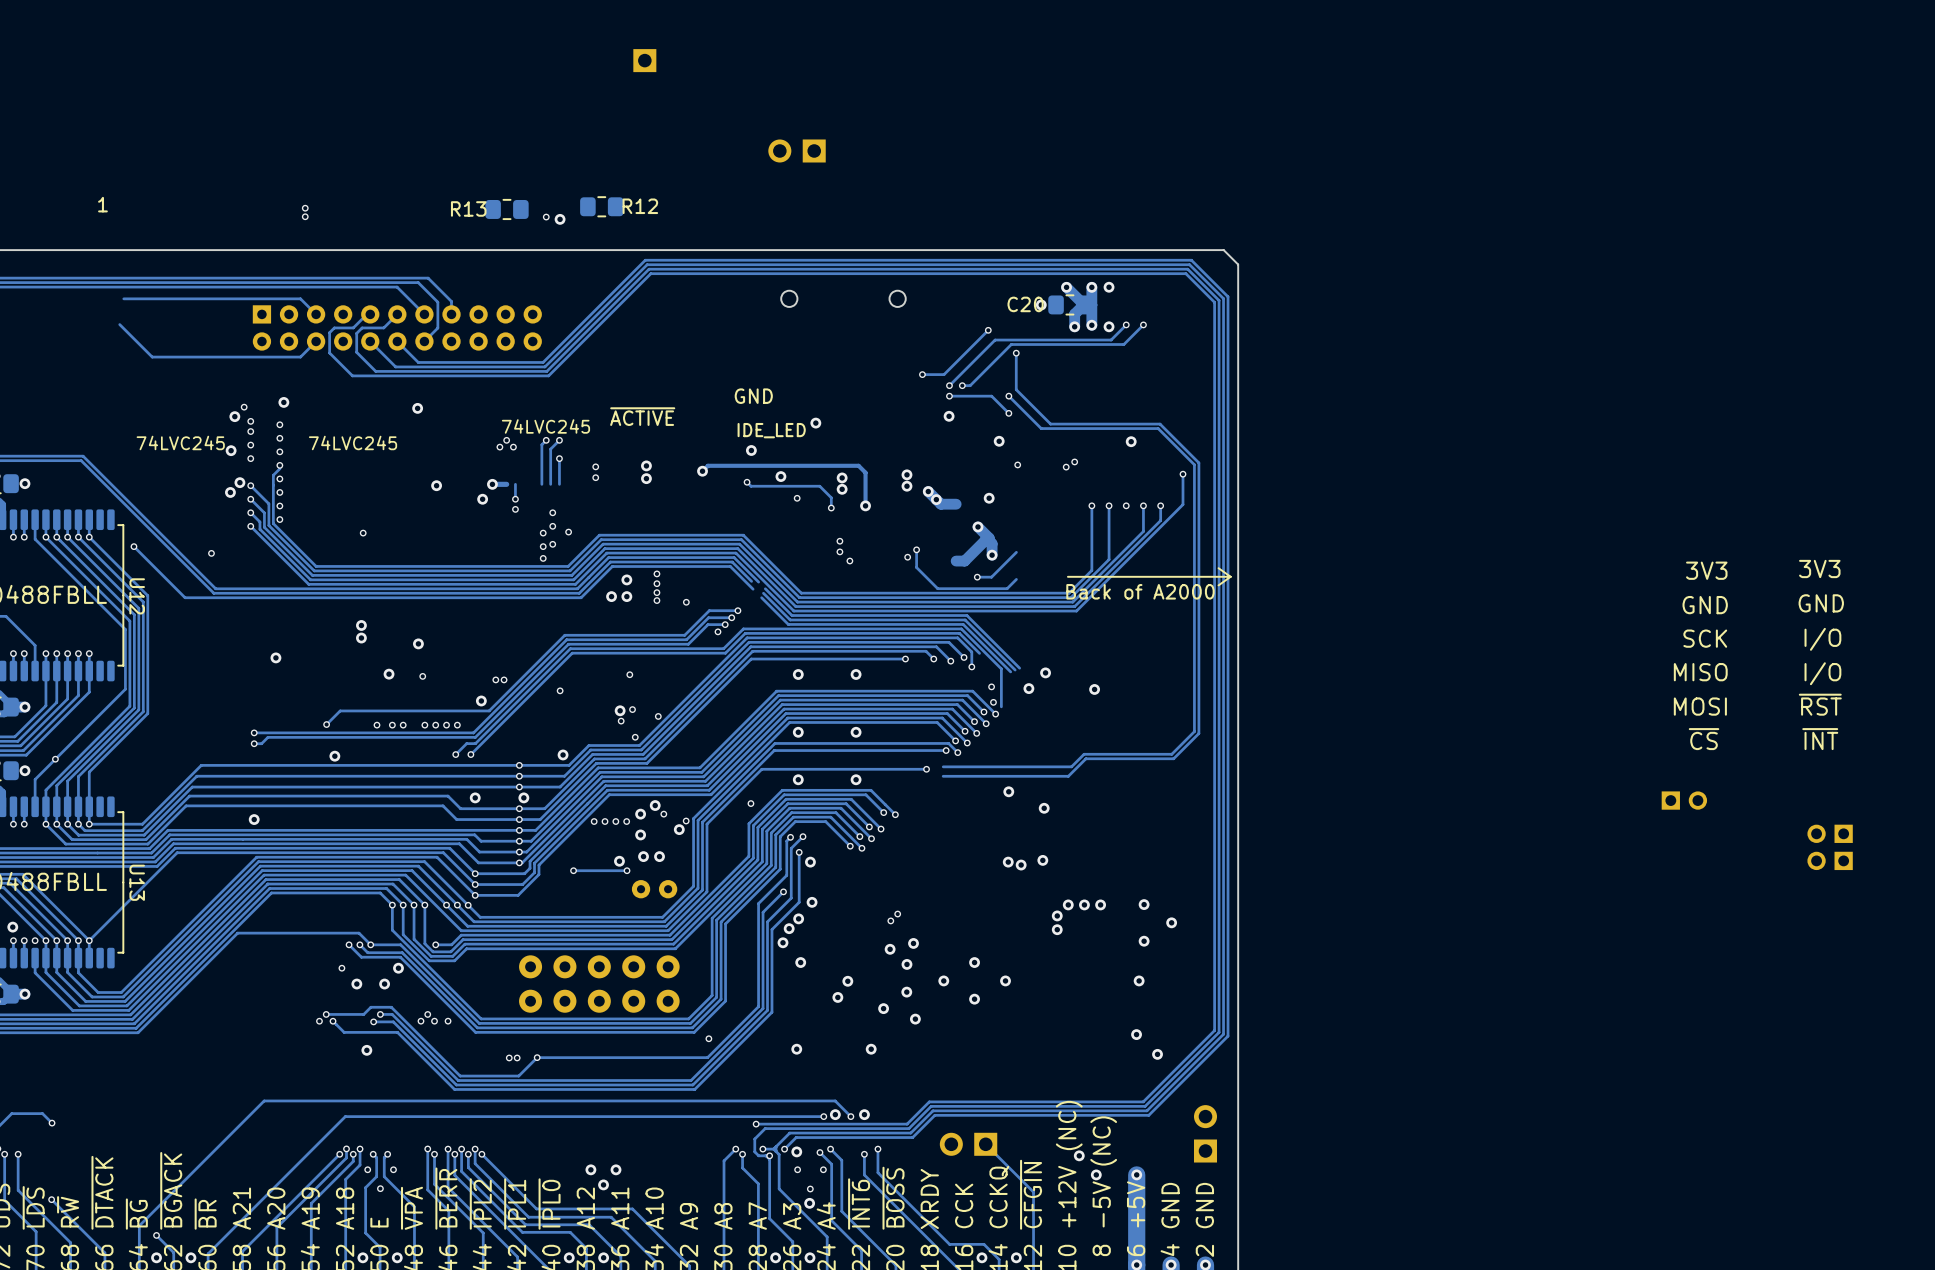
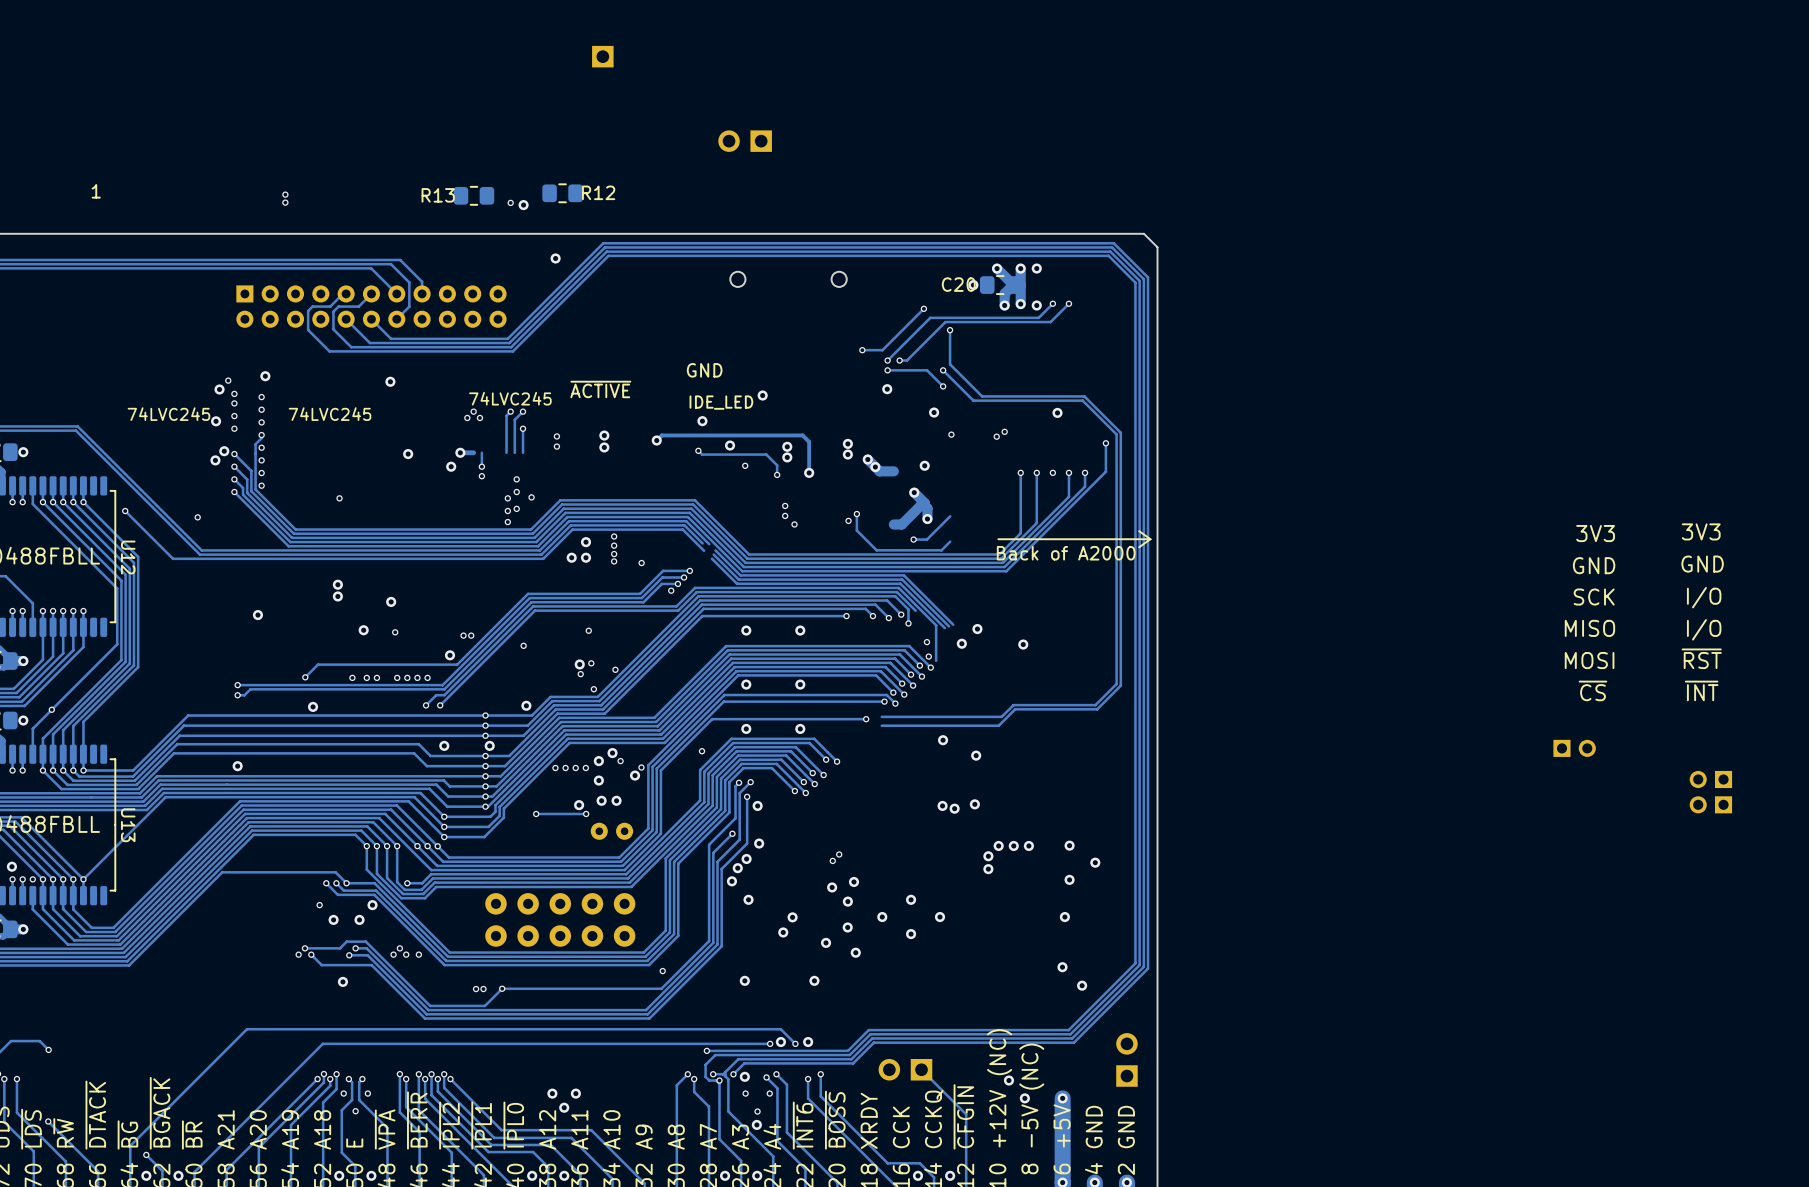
via: none -> (555, 258)
track: (123, 298) (300, 298) (316, 314) -> none
track: (119, 324) (152, 357) (300, 357) (316, 341) -> none

